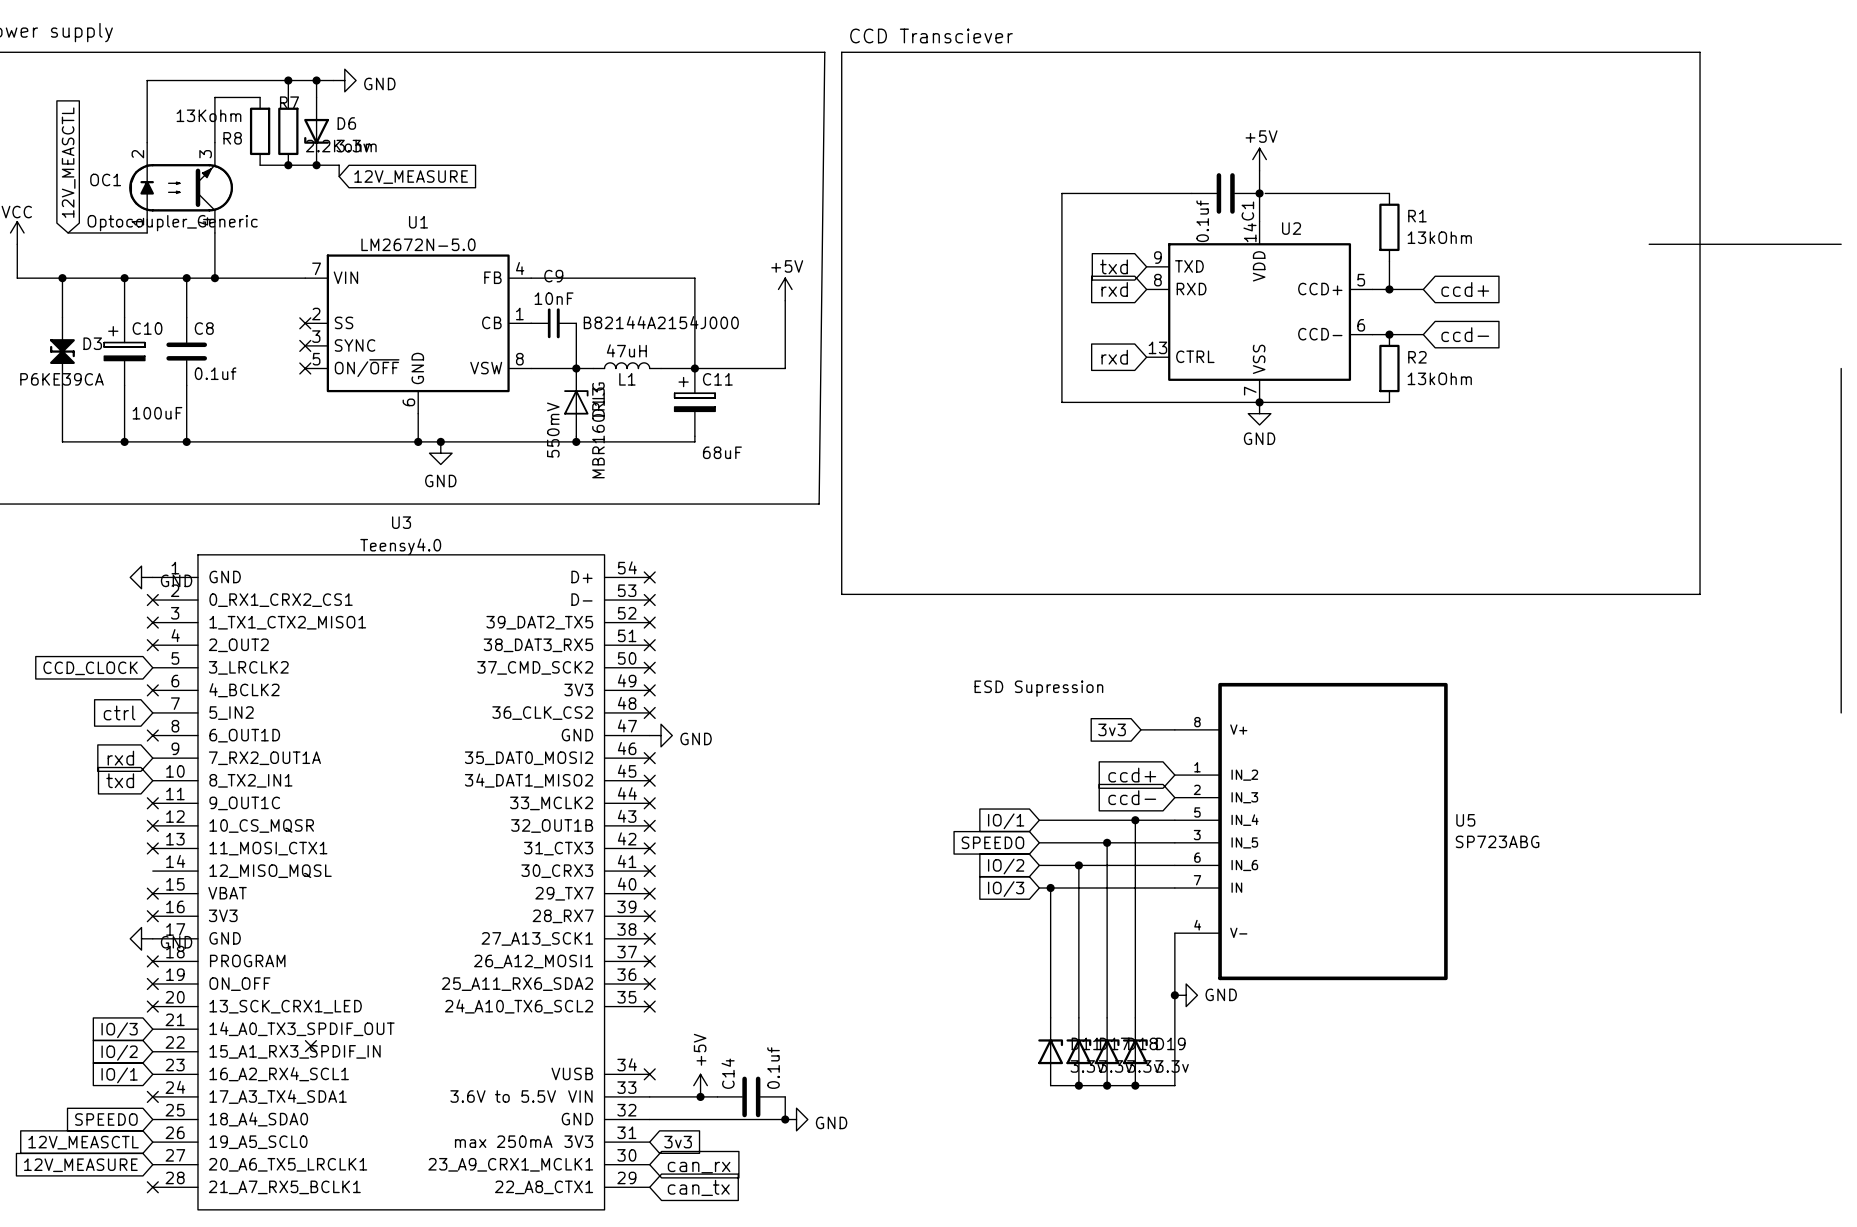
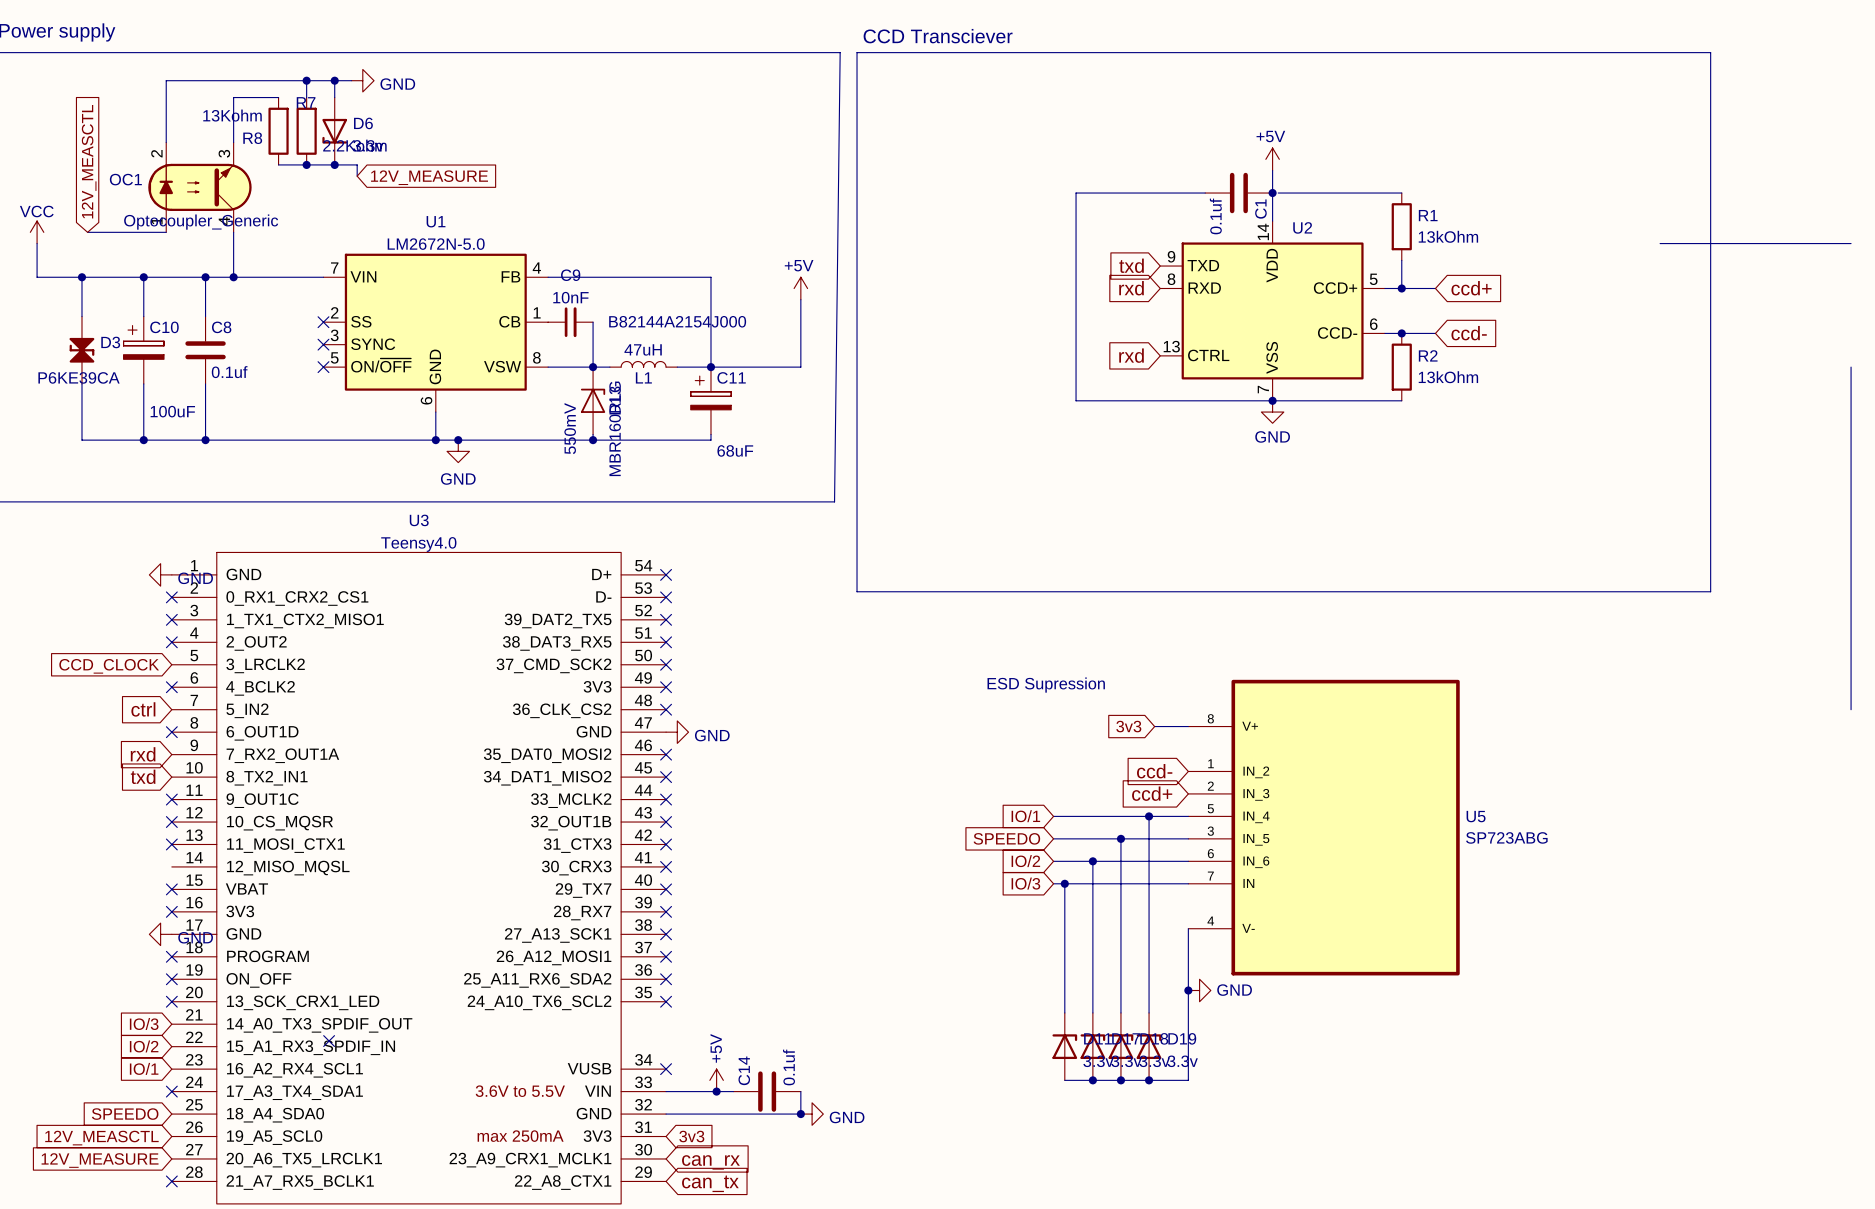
global label: ccd+ (1132, 775) -> ccd- (1154, 771)
global label: ccd- (1132, 797) -> ccd+ (1152, 793)

